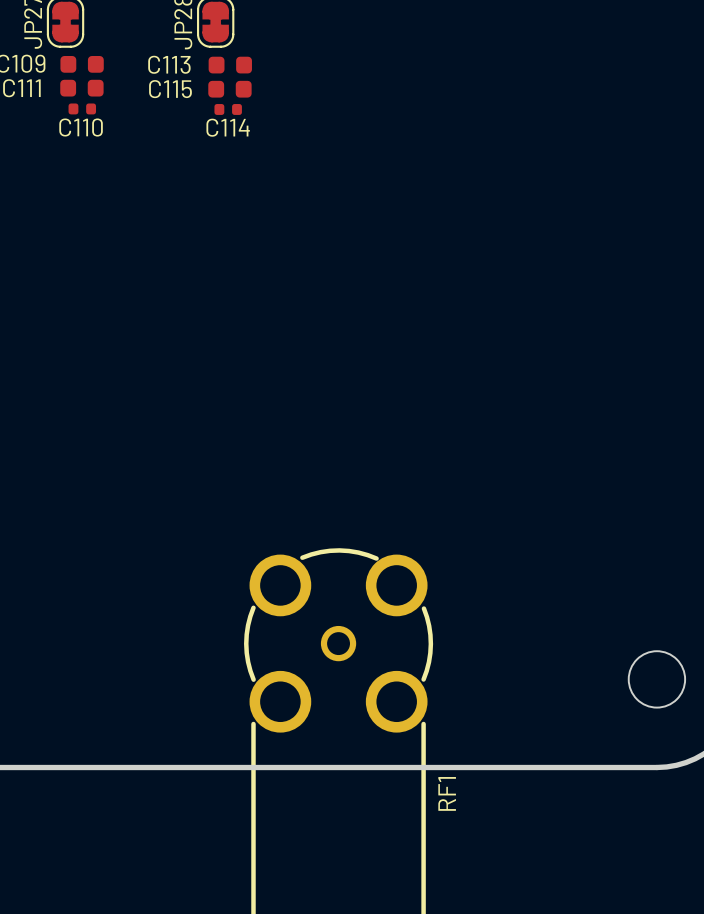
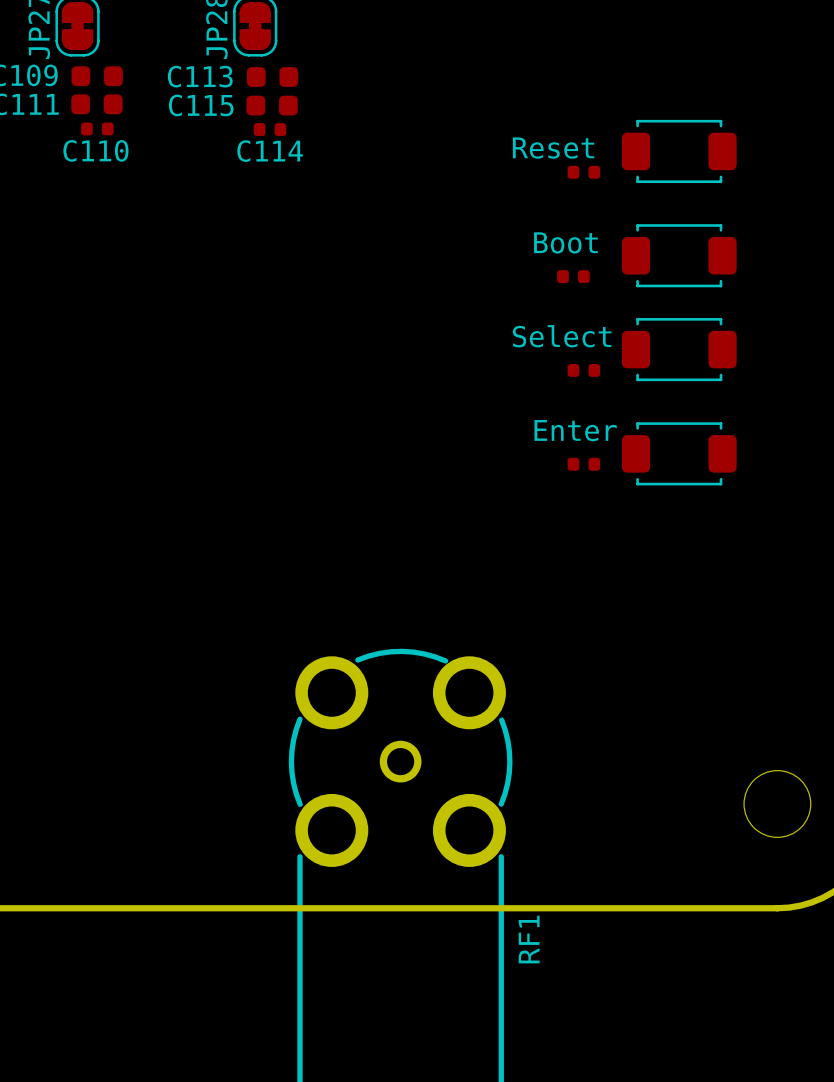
text: none -> Reset (553, 148)
part: none -> (679, 151)
part: none -> (583, 172)
text: none -> Boot (565, 242)
part: none -> (679, 255)
part: none -> (573, 276)
text: none -> Select (562, 336)
part: none -> (679, 349)
part: none -> (583, 370)
text: none -> Enter (575, 430)
part: none -> (679, 453)
part: none -> (583, 464)

